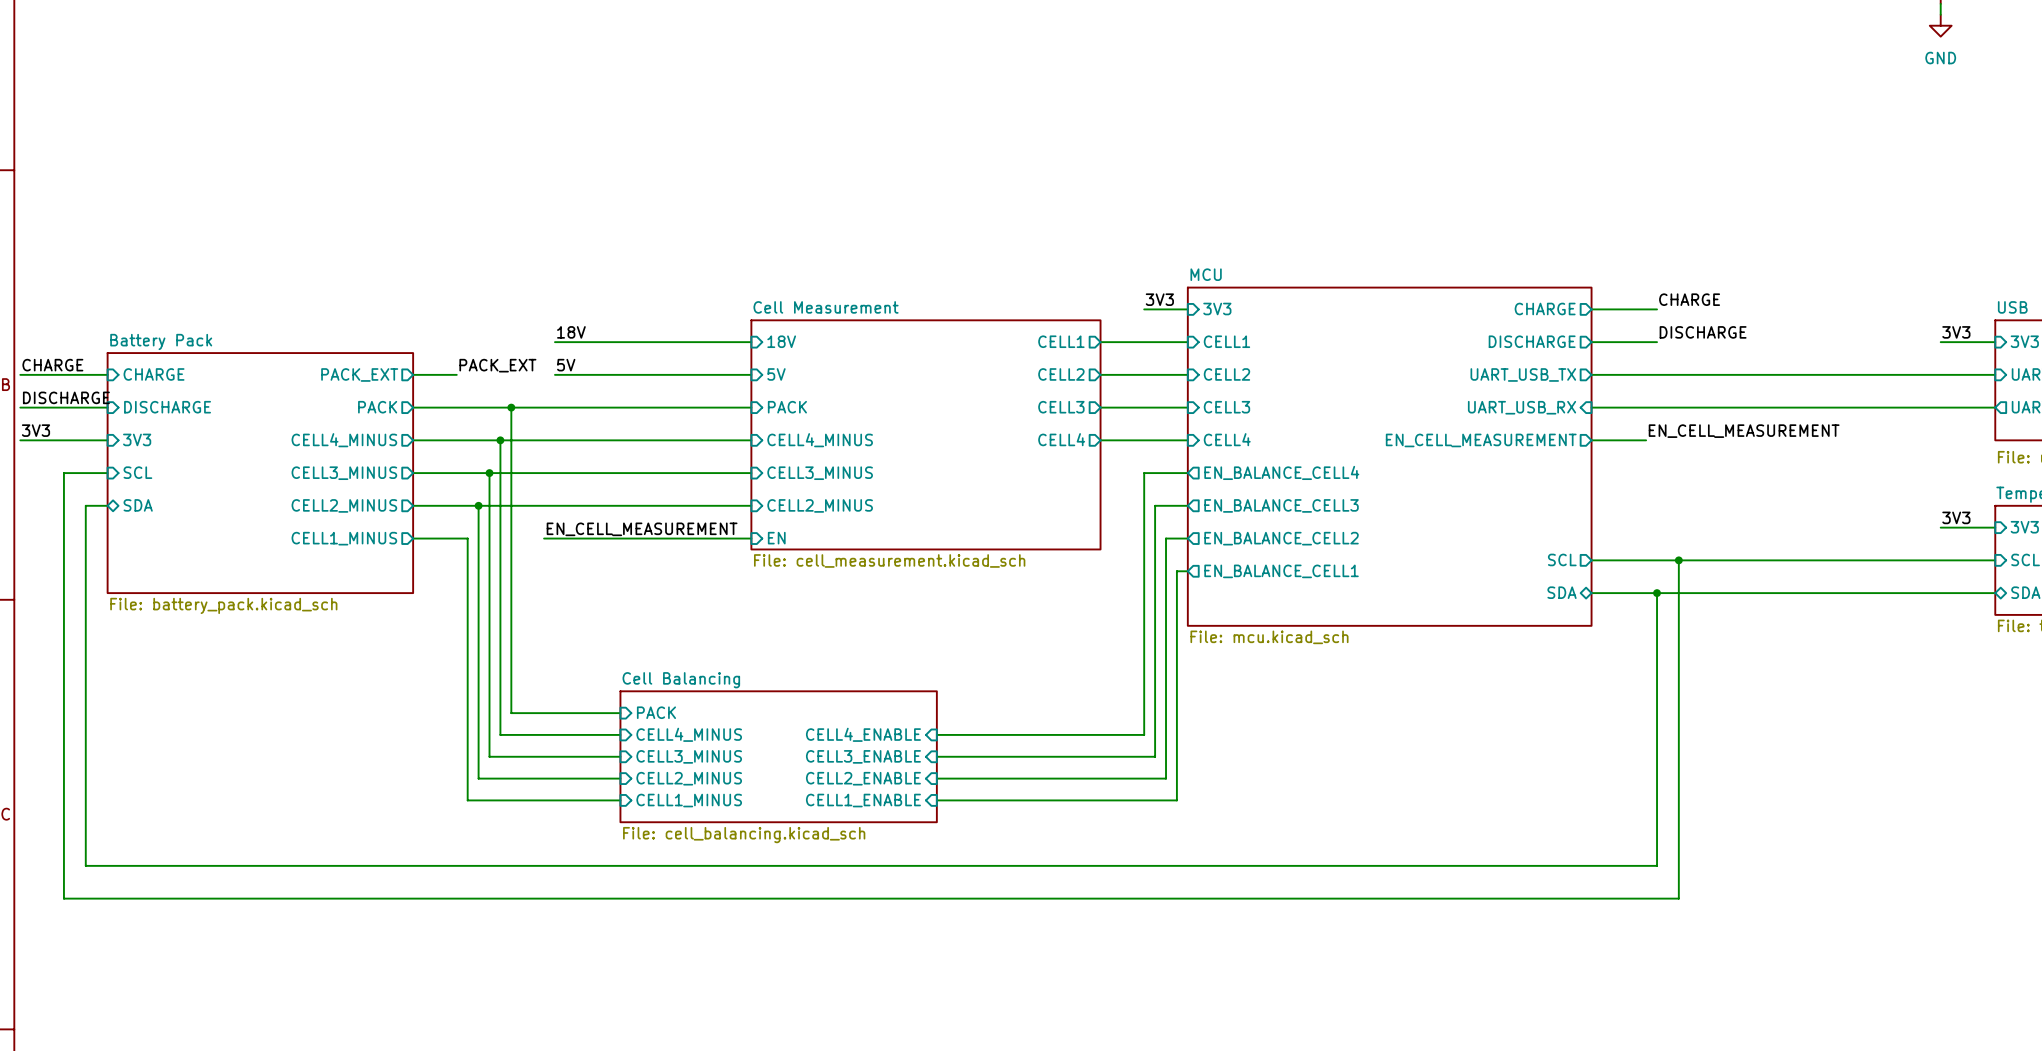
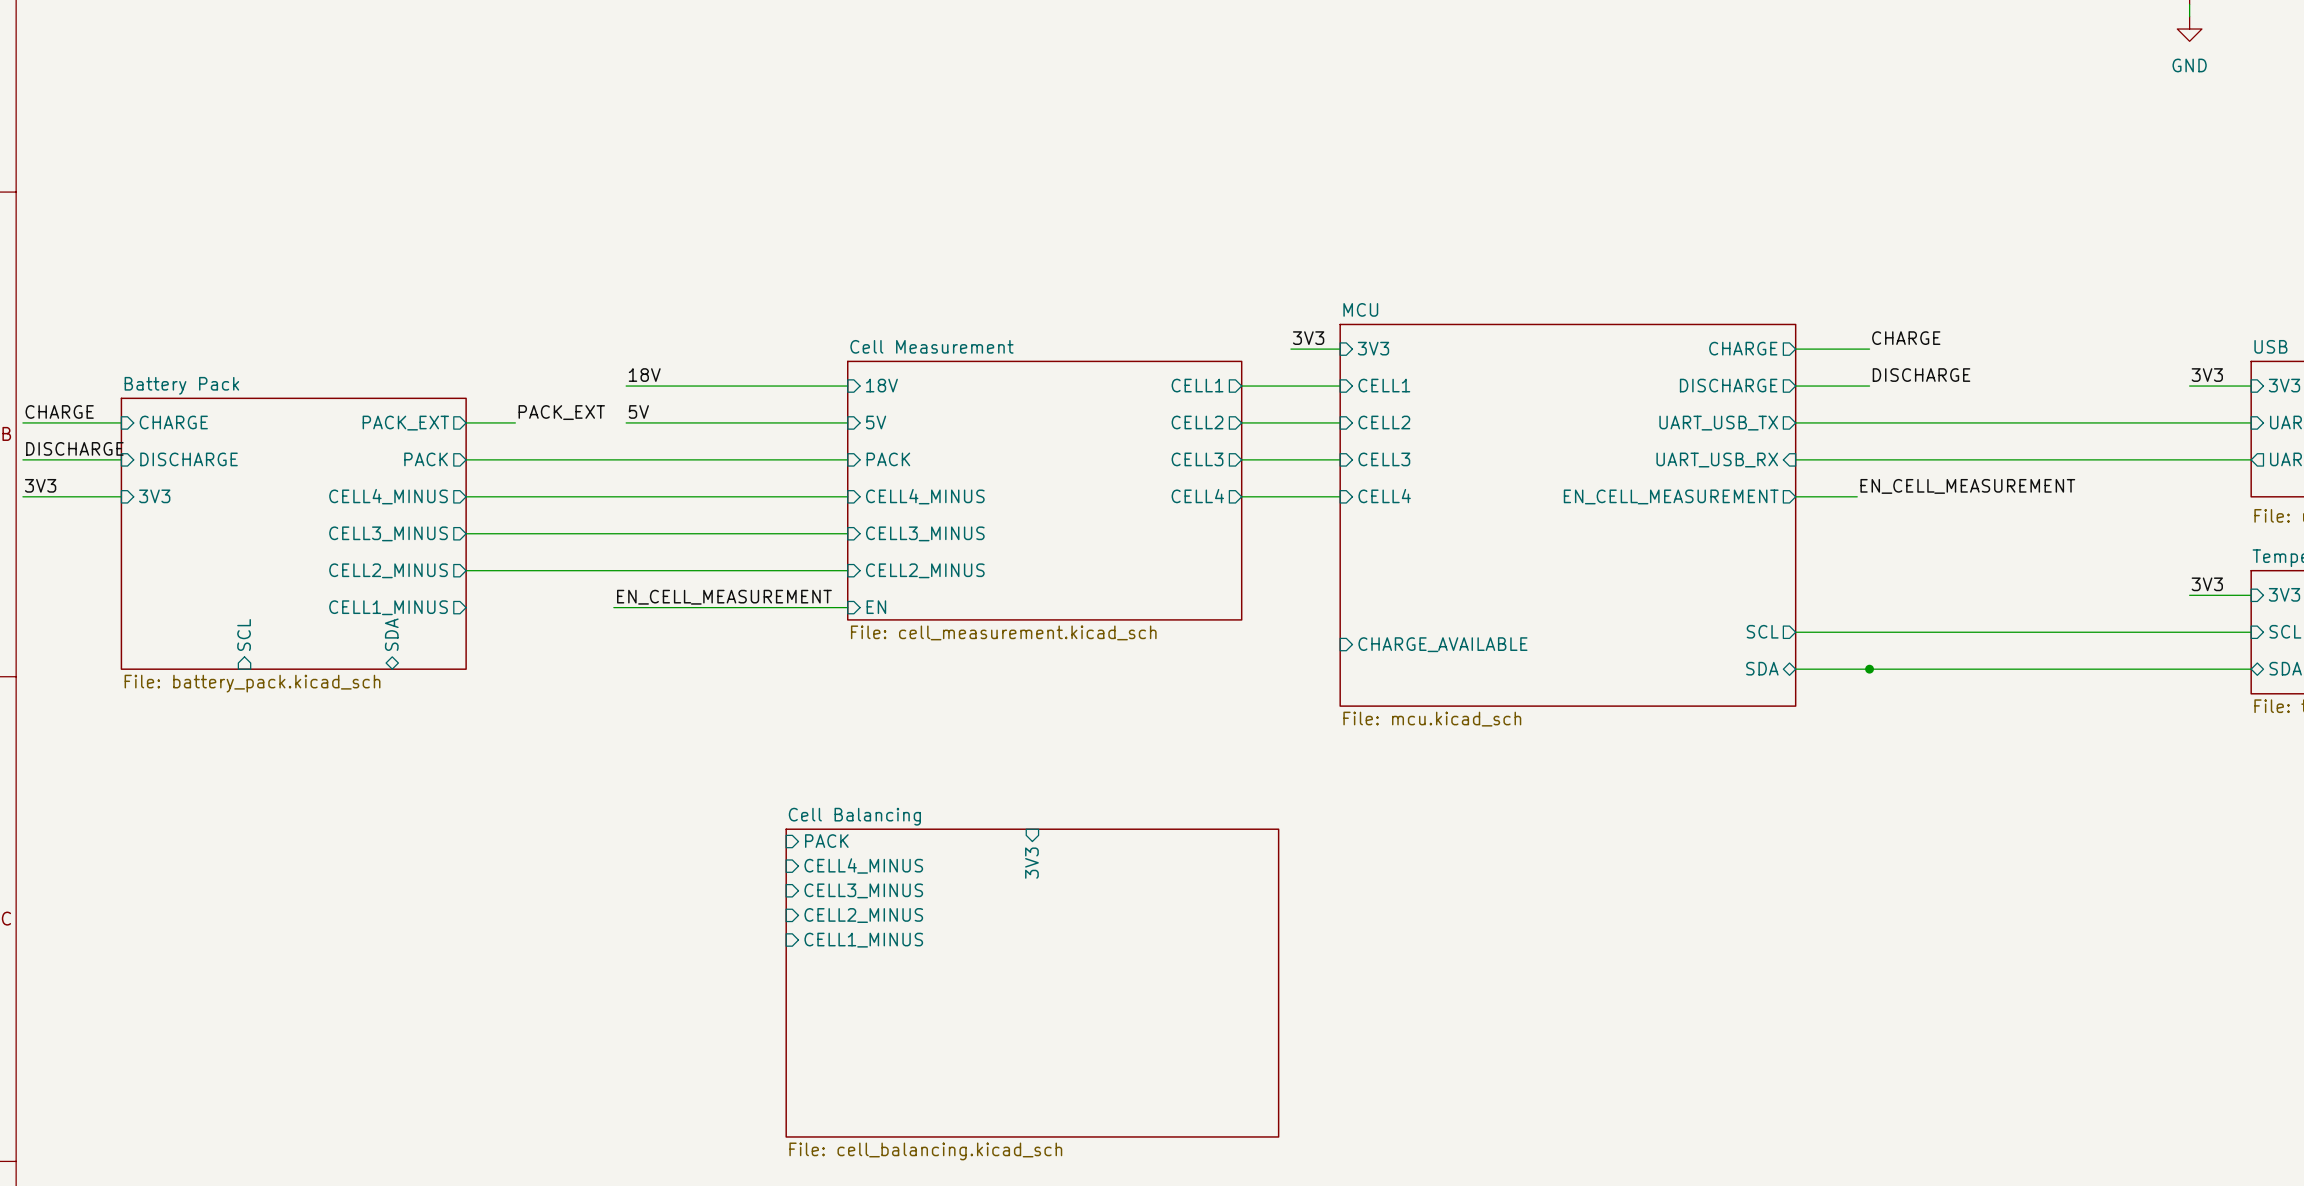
wire: (511, 407) (511, 713) (620, 713) -> none
junction: (511, 407) -> none
wire: (500, 440) (500, 734) (620, 734) -> none
junction: (500, 440) -> none
sheet pin rotation: 0° (137, 472) -> 90° counterclockwise (244, 634)
sheet pin position: SCL (137, 472) -> SCL (244, 634)
sheet pin: EN_BALANCE_CELL4 (1281, 472) -> none
wire: (107, 473) (63, 473) (63, 898) (1678, 898) (1678, 560) -> none
wire: (489, 473) (489, 756) (620, 756) -> none
junction: (489, 473) -> none
wire: (1187, 473) (1144, 473) (1144, 734) (936, 734) -> none
wire: (107, 505) (85, 505) (85, 865) (1657, 865) (1657, 593) -> none
sheet pin: SDA (138, 505) -> none
wire: (478, 505) (478, 778) (620, 778) -> none
junction: (478, 505) -> none
wire: (1187, 505) (1155, 505) (1155, 756) (936, 756) -> none
sheet pin: EN_BALANCE_CELL3 (1281, 505) -> none
wire: (413, 538) (467, 538) (467, 800) (620, 800) -> none
wire: (1187, 538) (1166, 538) (1166, 778) (936, 778) -> none
sheet pin: EN_BALANCE_CELL2 (1281, 538) -> none
junction: (1678, 560) -> none
sheet pin: none -> SDA (391, 634)
wire: (1187, 571) (1176, 571) (1176, 800) (936, 800) -> none
sheet pin shape: output (1281, 571) -> input (1442, 644)
sheet pin: EN_BALANCE_CELL1 (1281, 571) -> CHARGE_AVAILABLE (1442, 644)
sheet pin position: PACK (656, 712) -> PACK (826, 841)
sheet pin position: CELL4_MINUS (689, 734) -> CELL4_MINUS (863, 865)
sheet pin: CELL4_ENABLE (863, 734) -> none
sheet pin position: CELL3_MINUS (689, 756) -> CELL3_MINUS (863, 890)
sheet Cell Balancing: File: cell_balancing.kicad_sch (778, 756) -> none
sheet pin: CELL3_ENABLE (863, 756) -> none
sheet pin: none -> 3V3 (1031, 863)
sheet pin position: CELL2_MINUS (689, 778) -> CELL2_MINUS (863, 915)
sheet pin: CELL2_ENABLE (863, 778) -> none
sheet pin position: CELL1_MINUS (689, 800) -> CELL1_MINUS (863, 940)
sheet pin: CELL1_ENABLE (863, 800) -> none
sheet Cell Balancing: none -> File: cell_balancing.kicad_sch (1032, 983)

